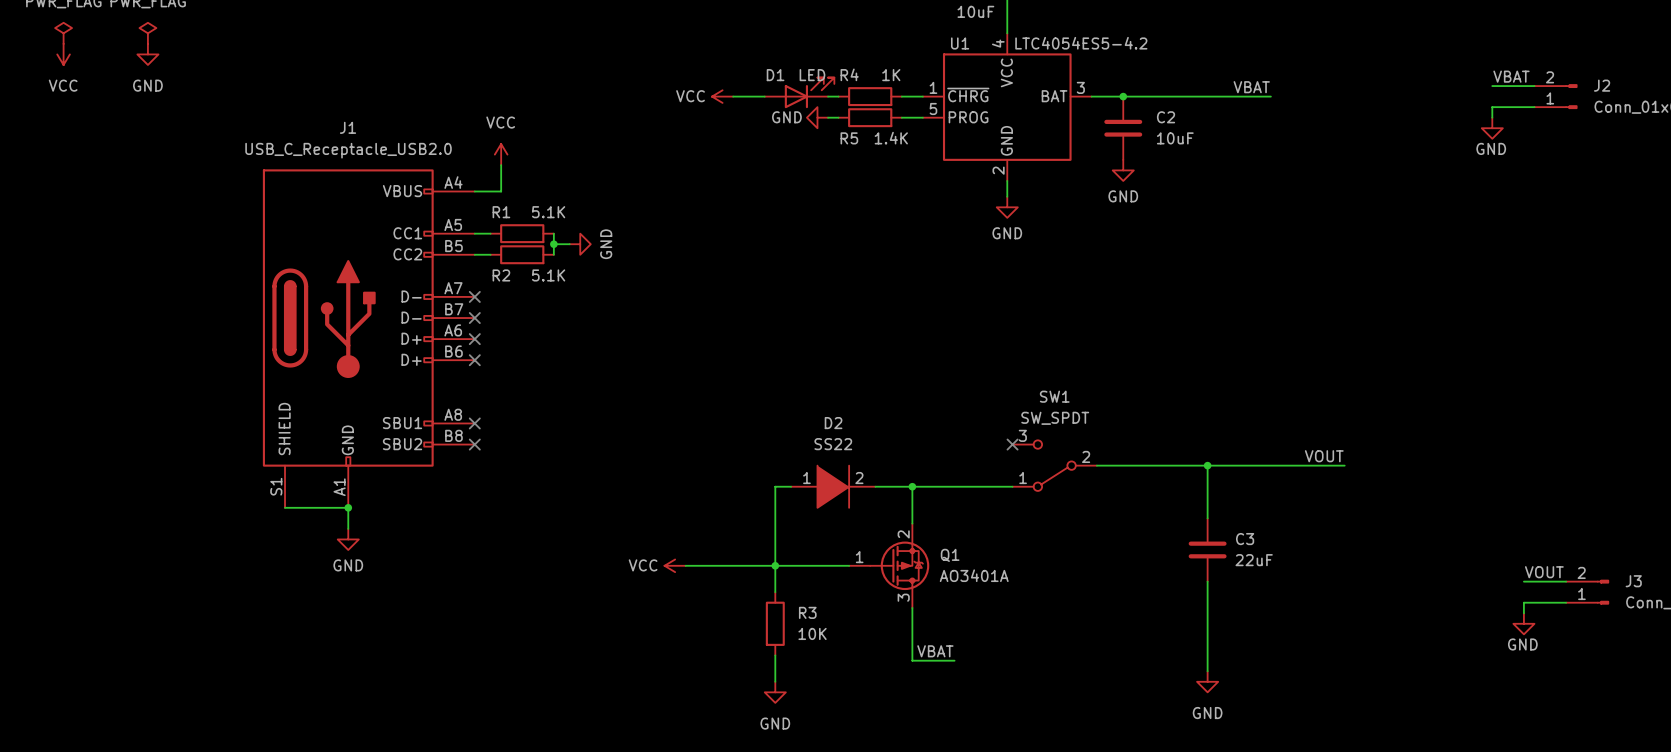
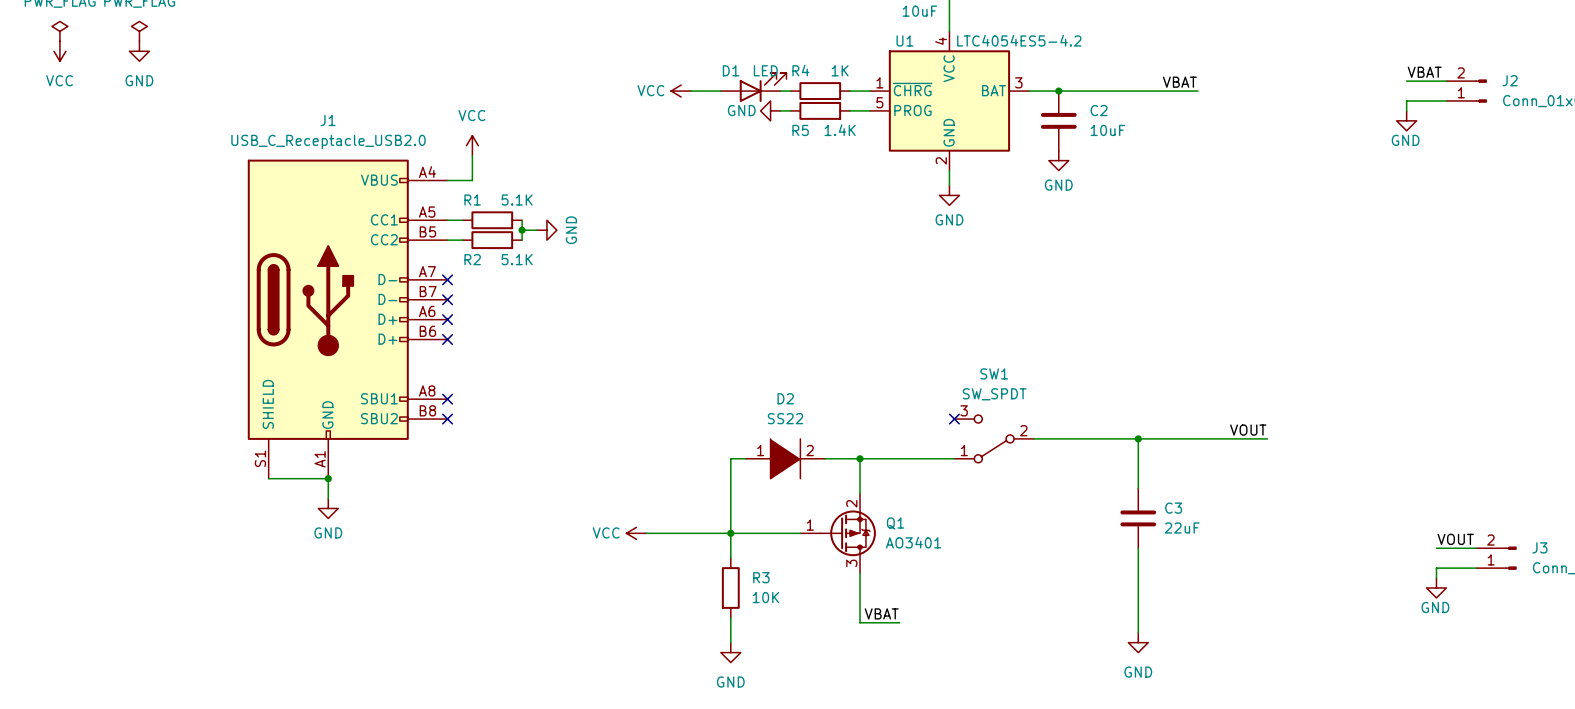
Q1 value: AO3401A (974, 575) -> AO3401 (913, 542)

